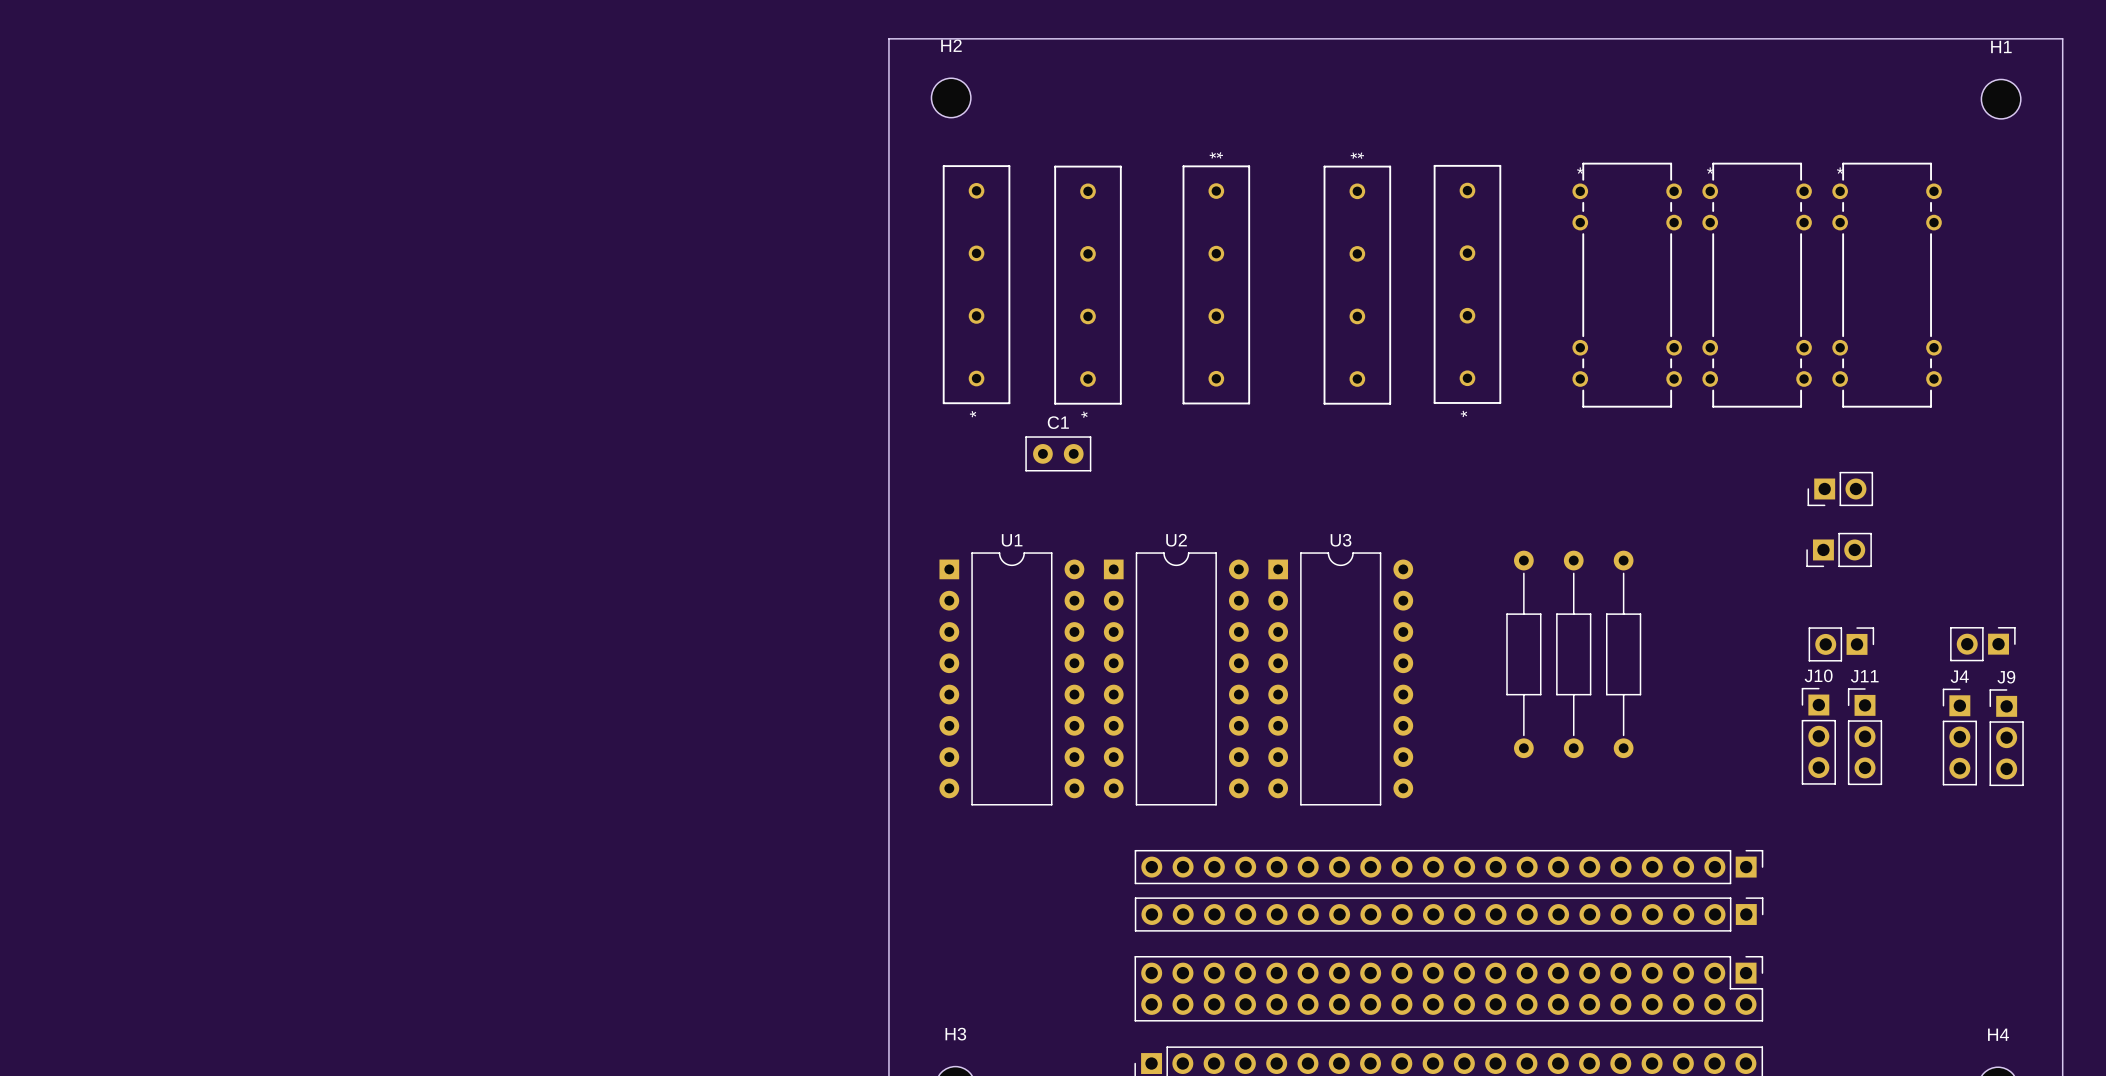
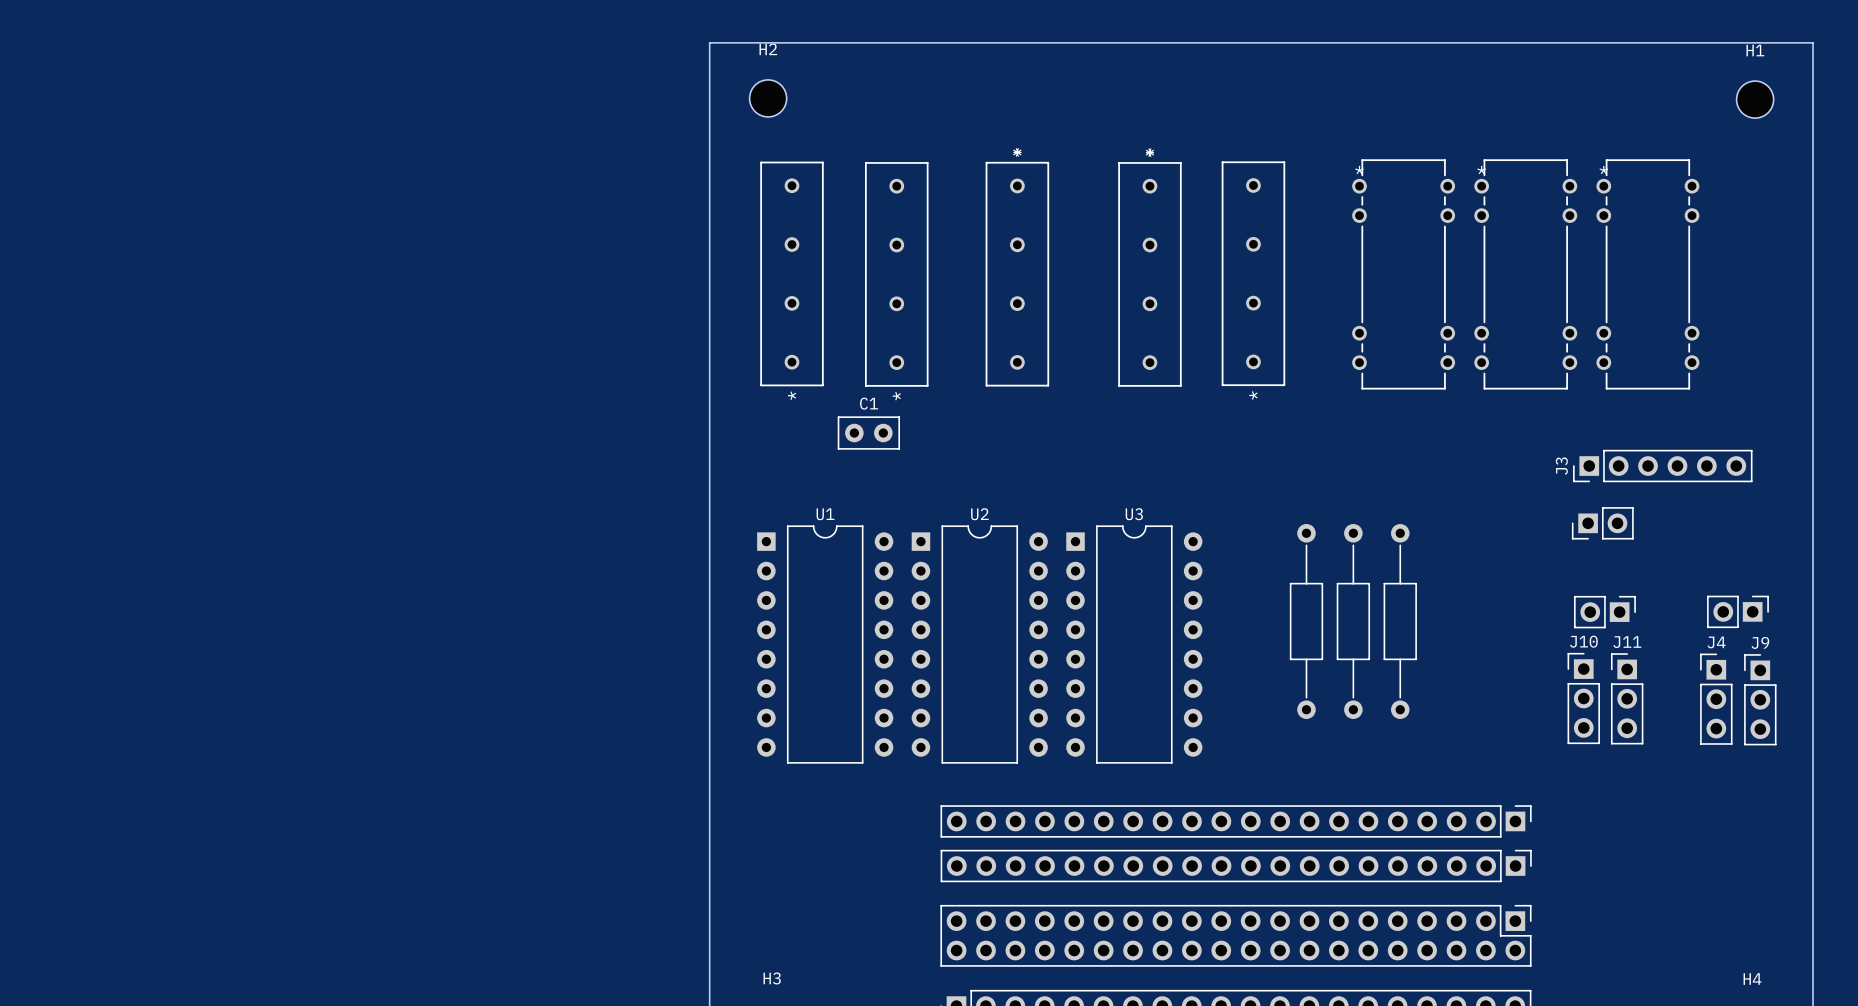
part: (1840, 488) -> none
J3: none -> (1662, 466)

